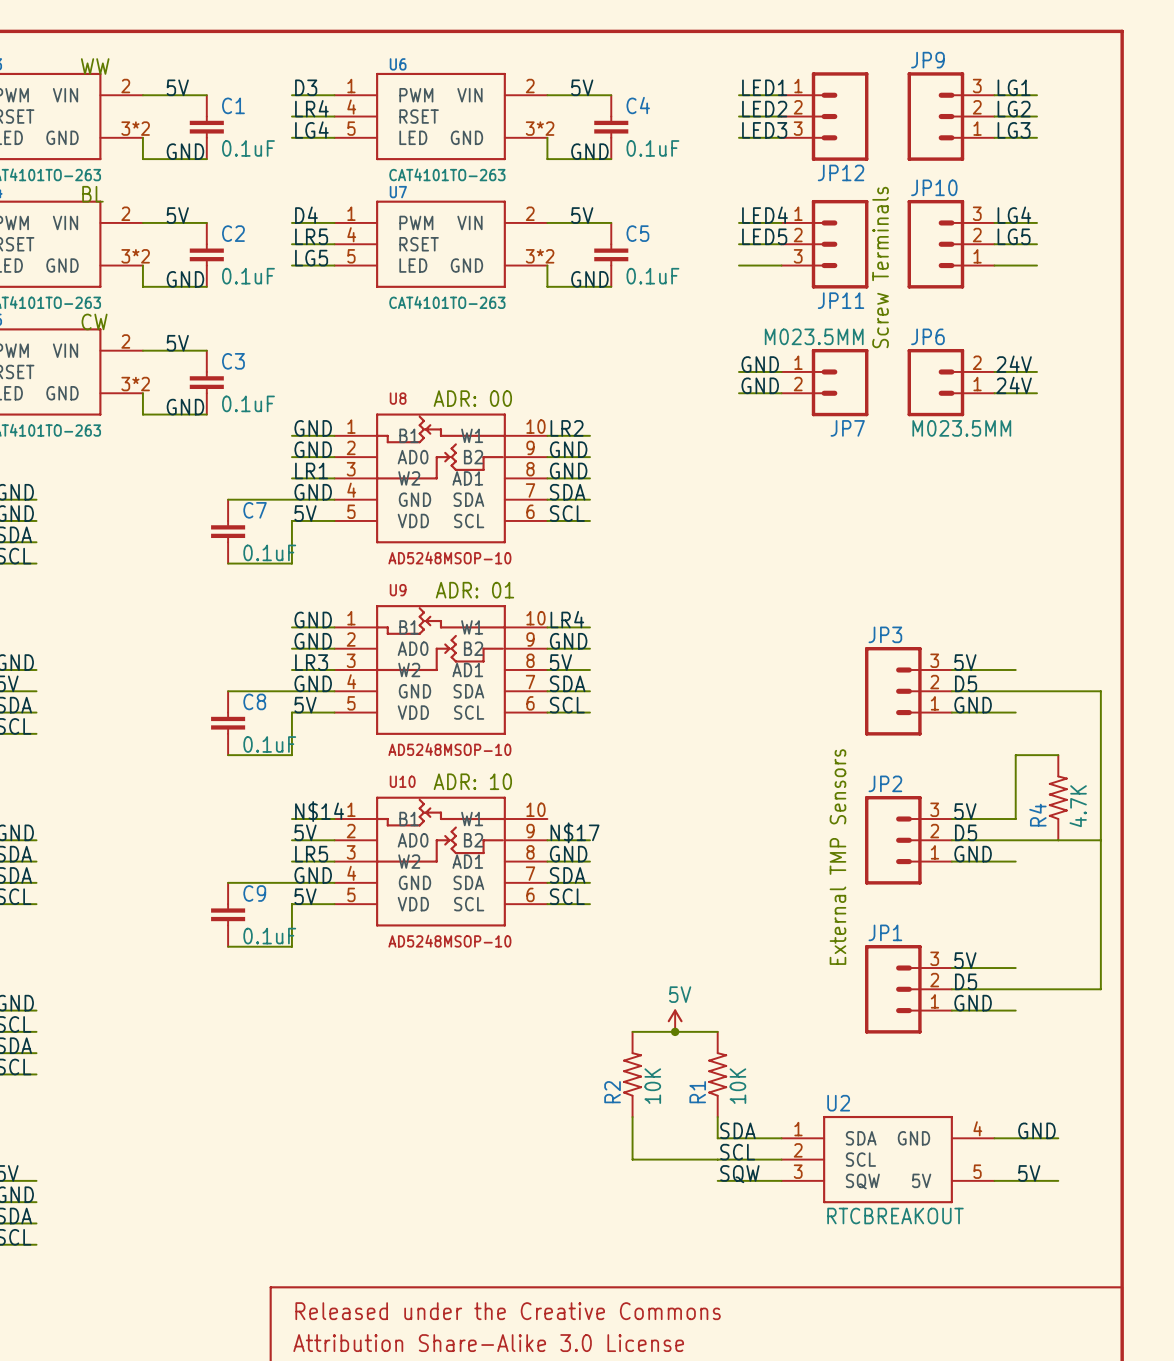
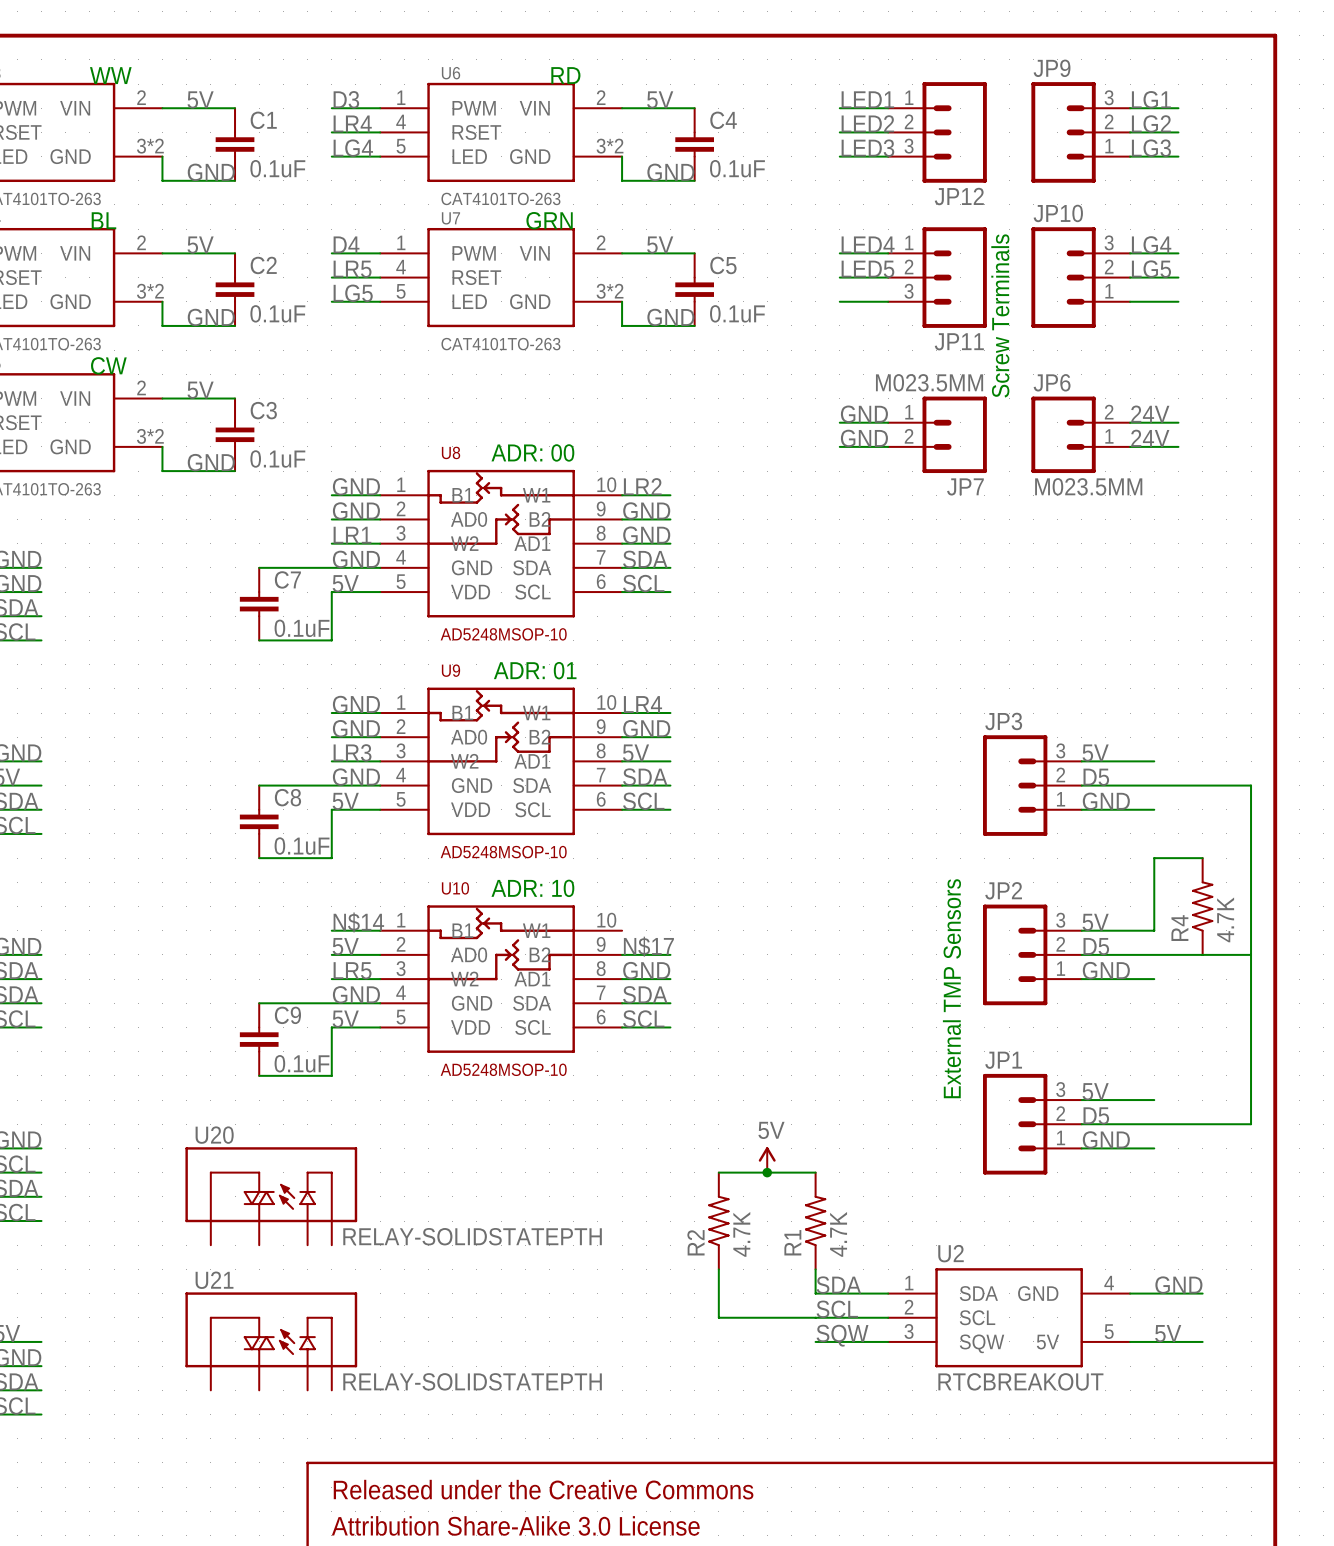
text: none -> RD (565, 75)
text: none -> GRN (549, 220)
U20: none -> RELAY-SOLIDSTATEPTH (271, 1196)
R2 value: 10K (652, 1086) -> 4.7K (741, 1234)
R1 value: 10K (737, 1086) -> 4.7K (838, 1234)
U21: none -> RELAY-SOLIDSTATEPTH (271, 1341)

